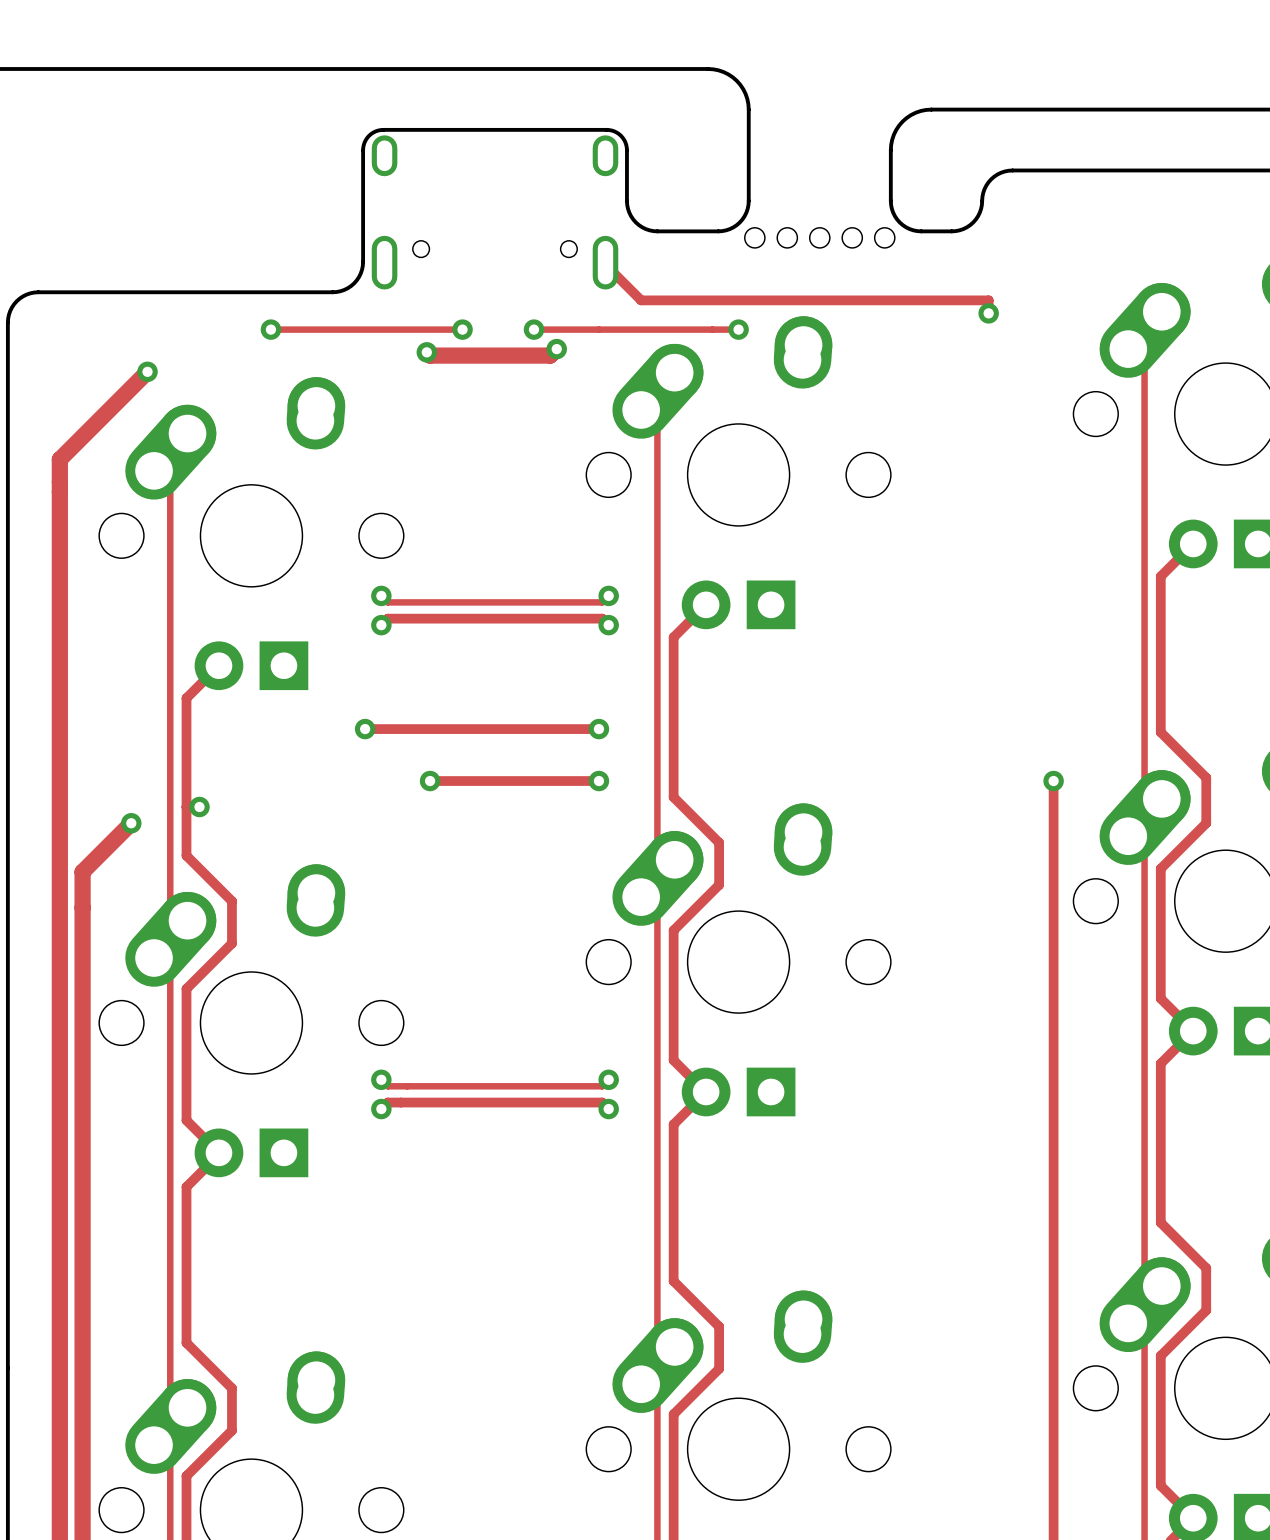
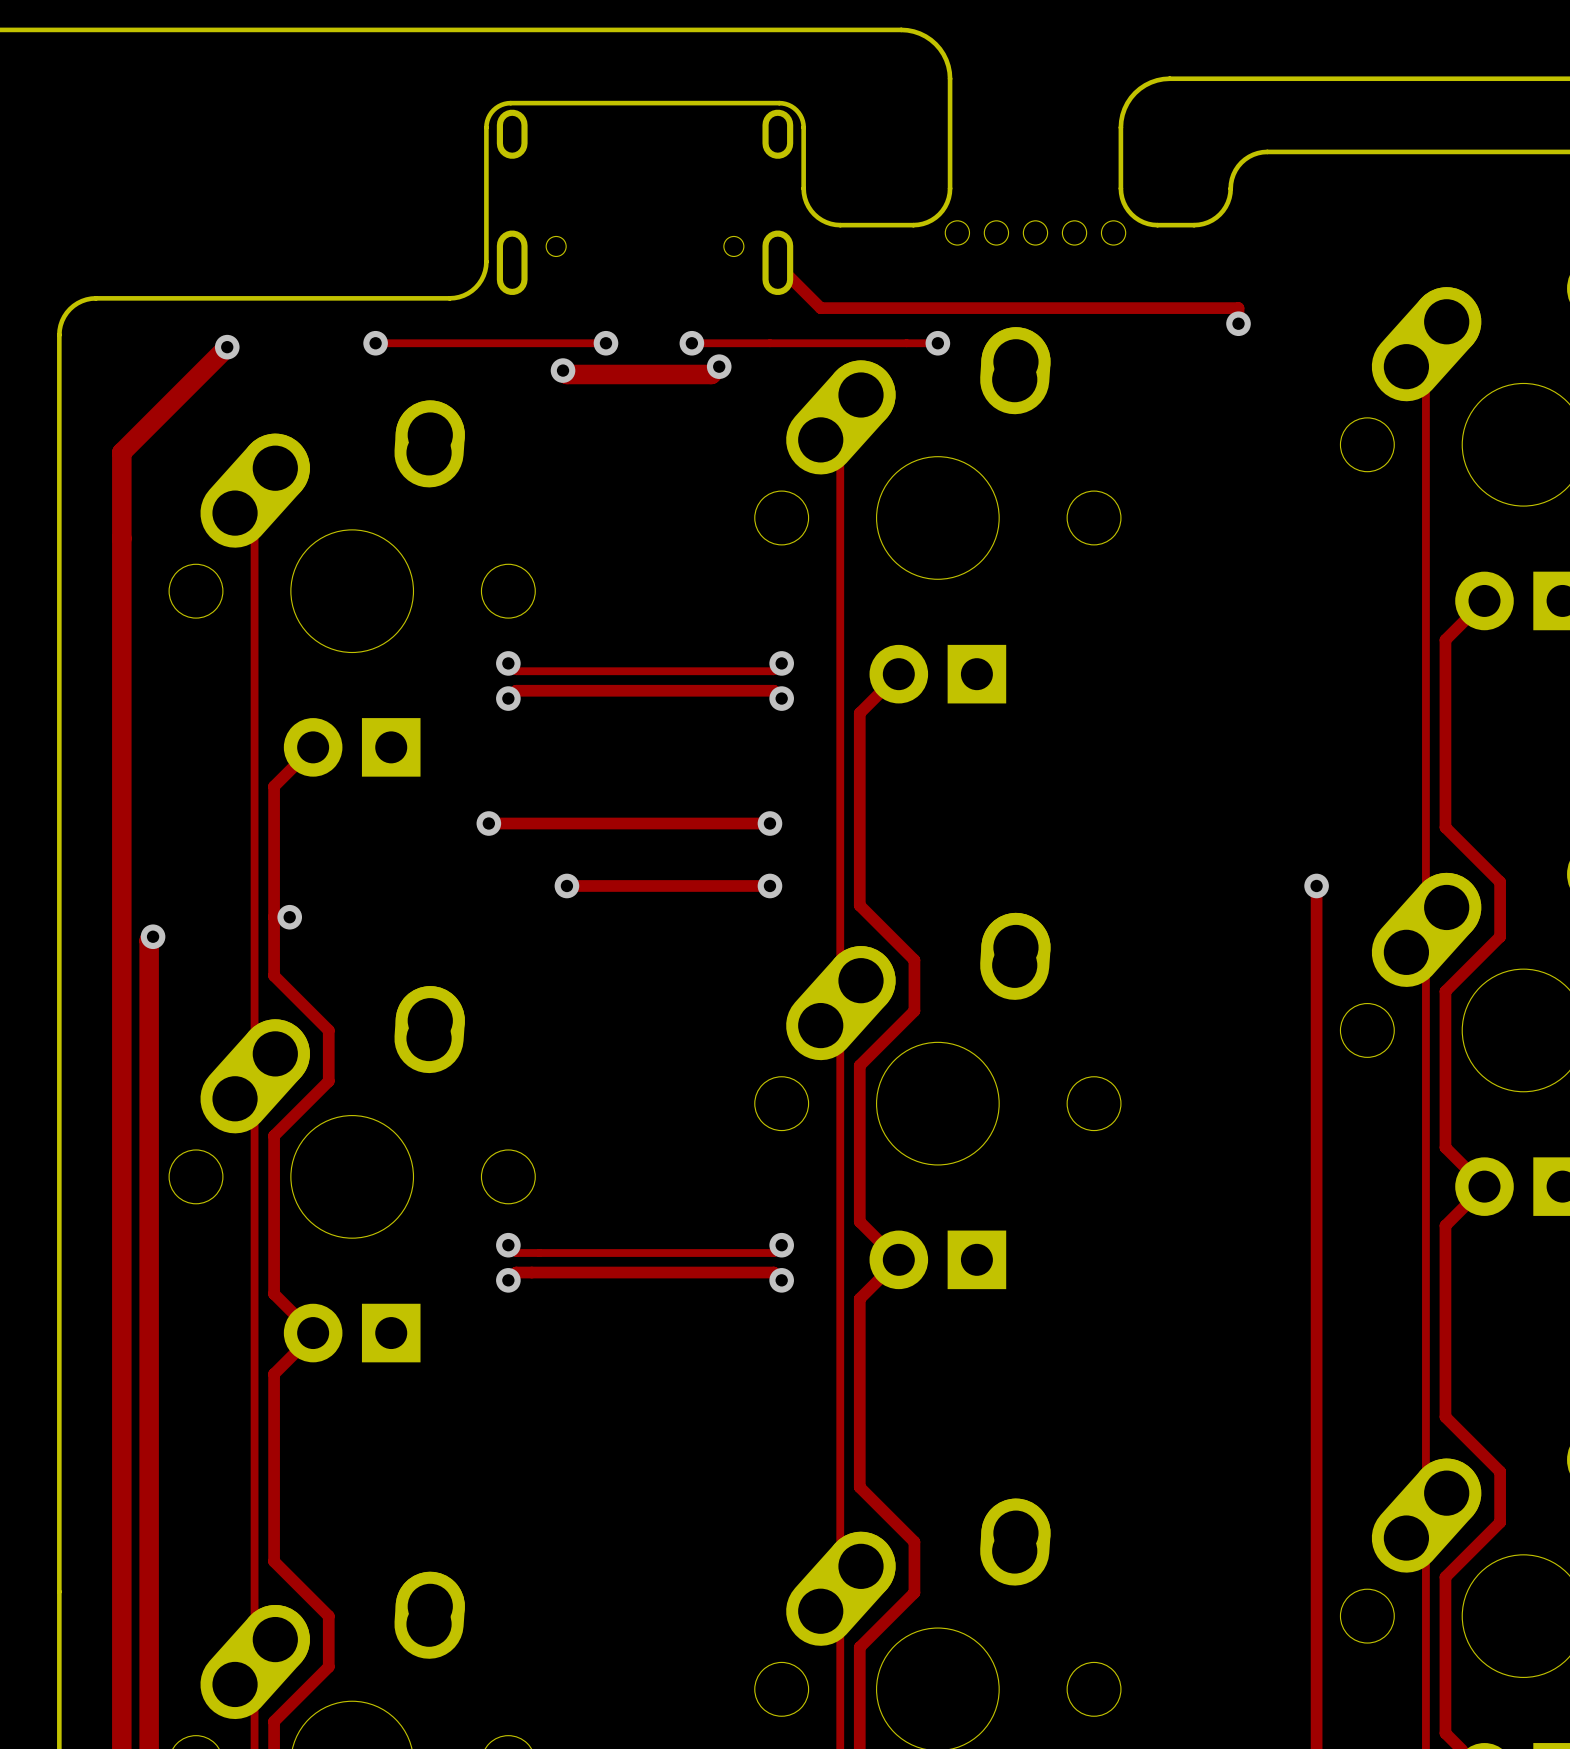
track: (147, 371) (59, 459) -> (227, 347) (121, 452) (121, 499)
via position: (147, 371) -> (227, 347)
track: (131, 823) (82, 871) -> (153, 936) (149, 940) (149, 995)
via position: (131, 823) -> (153, 936)

